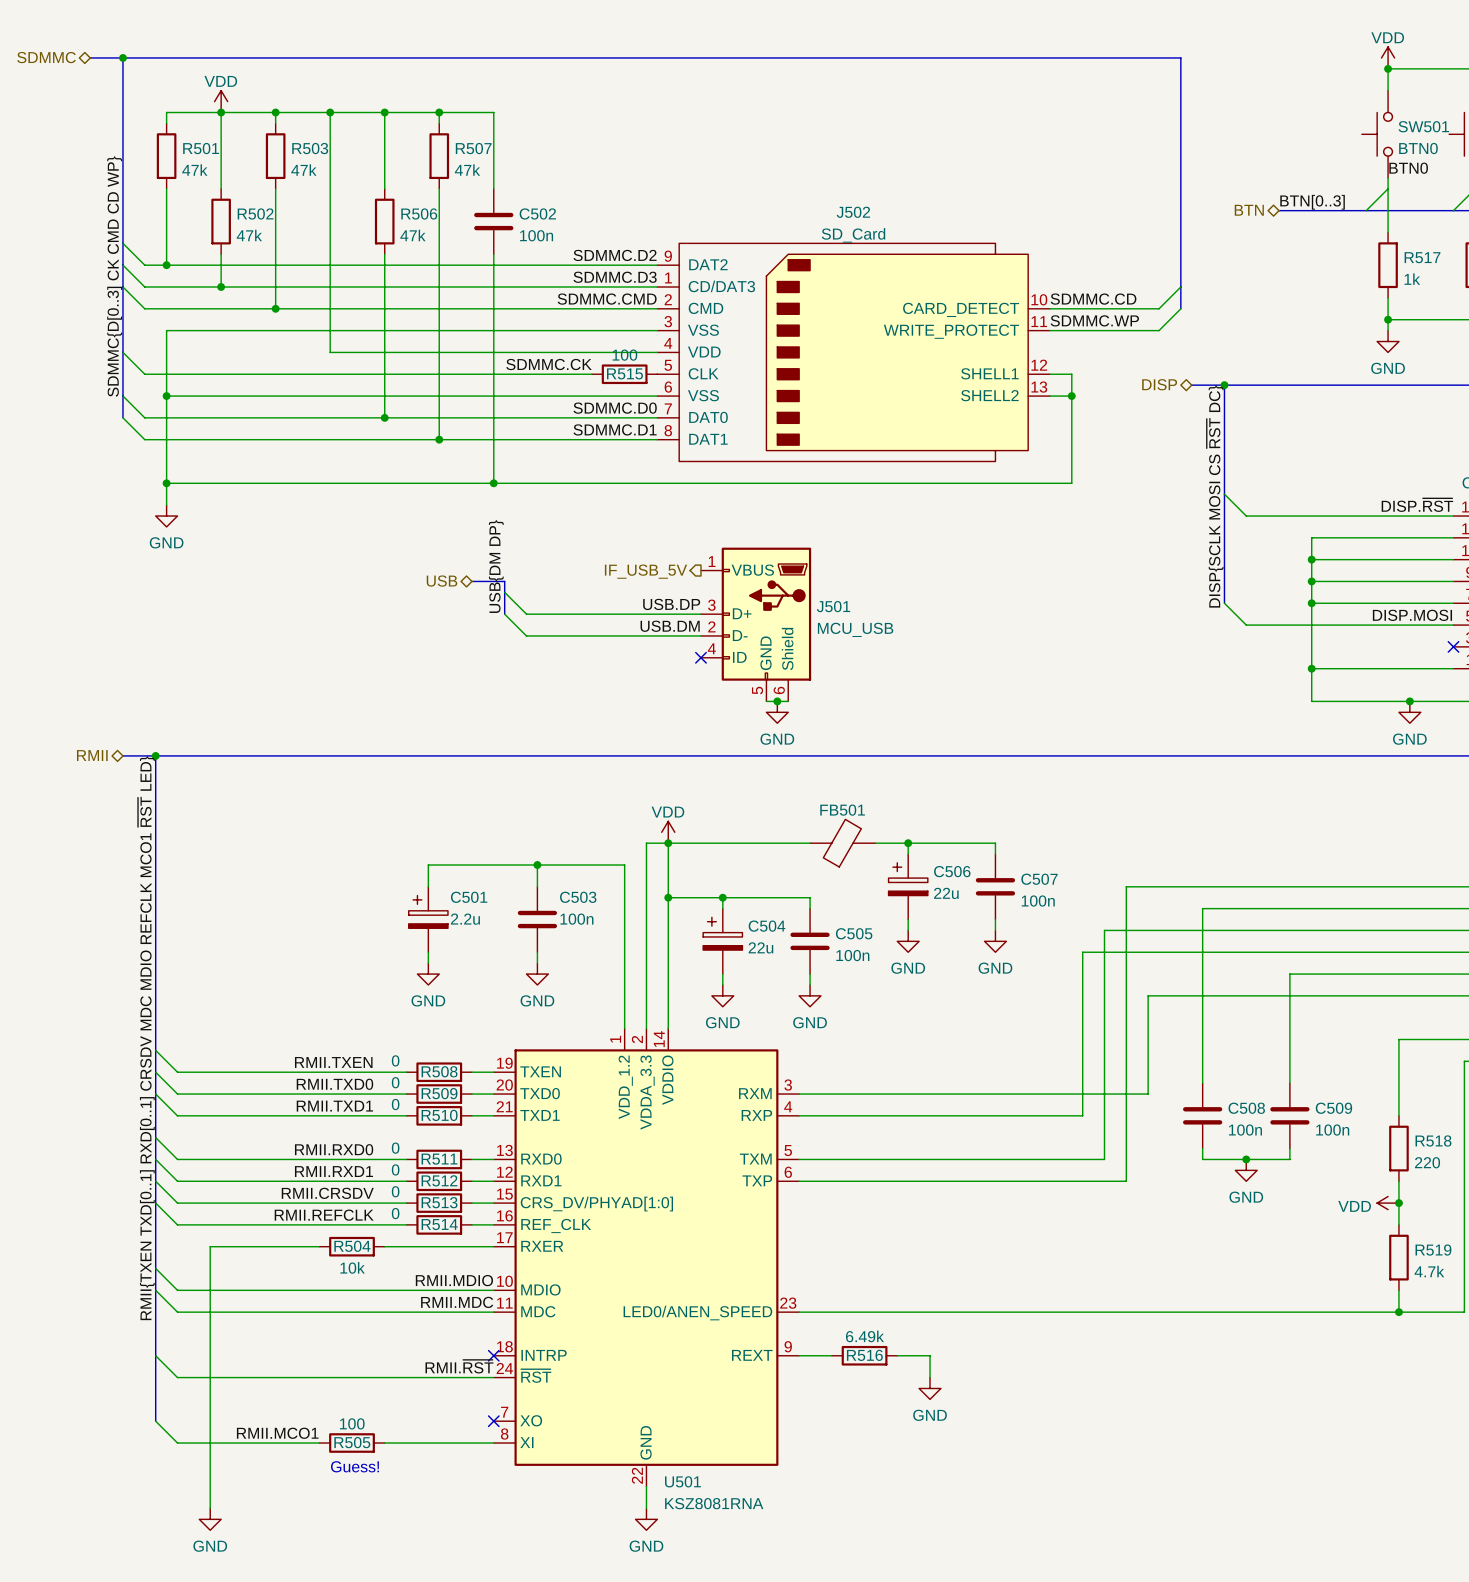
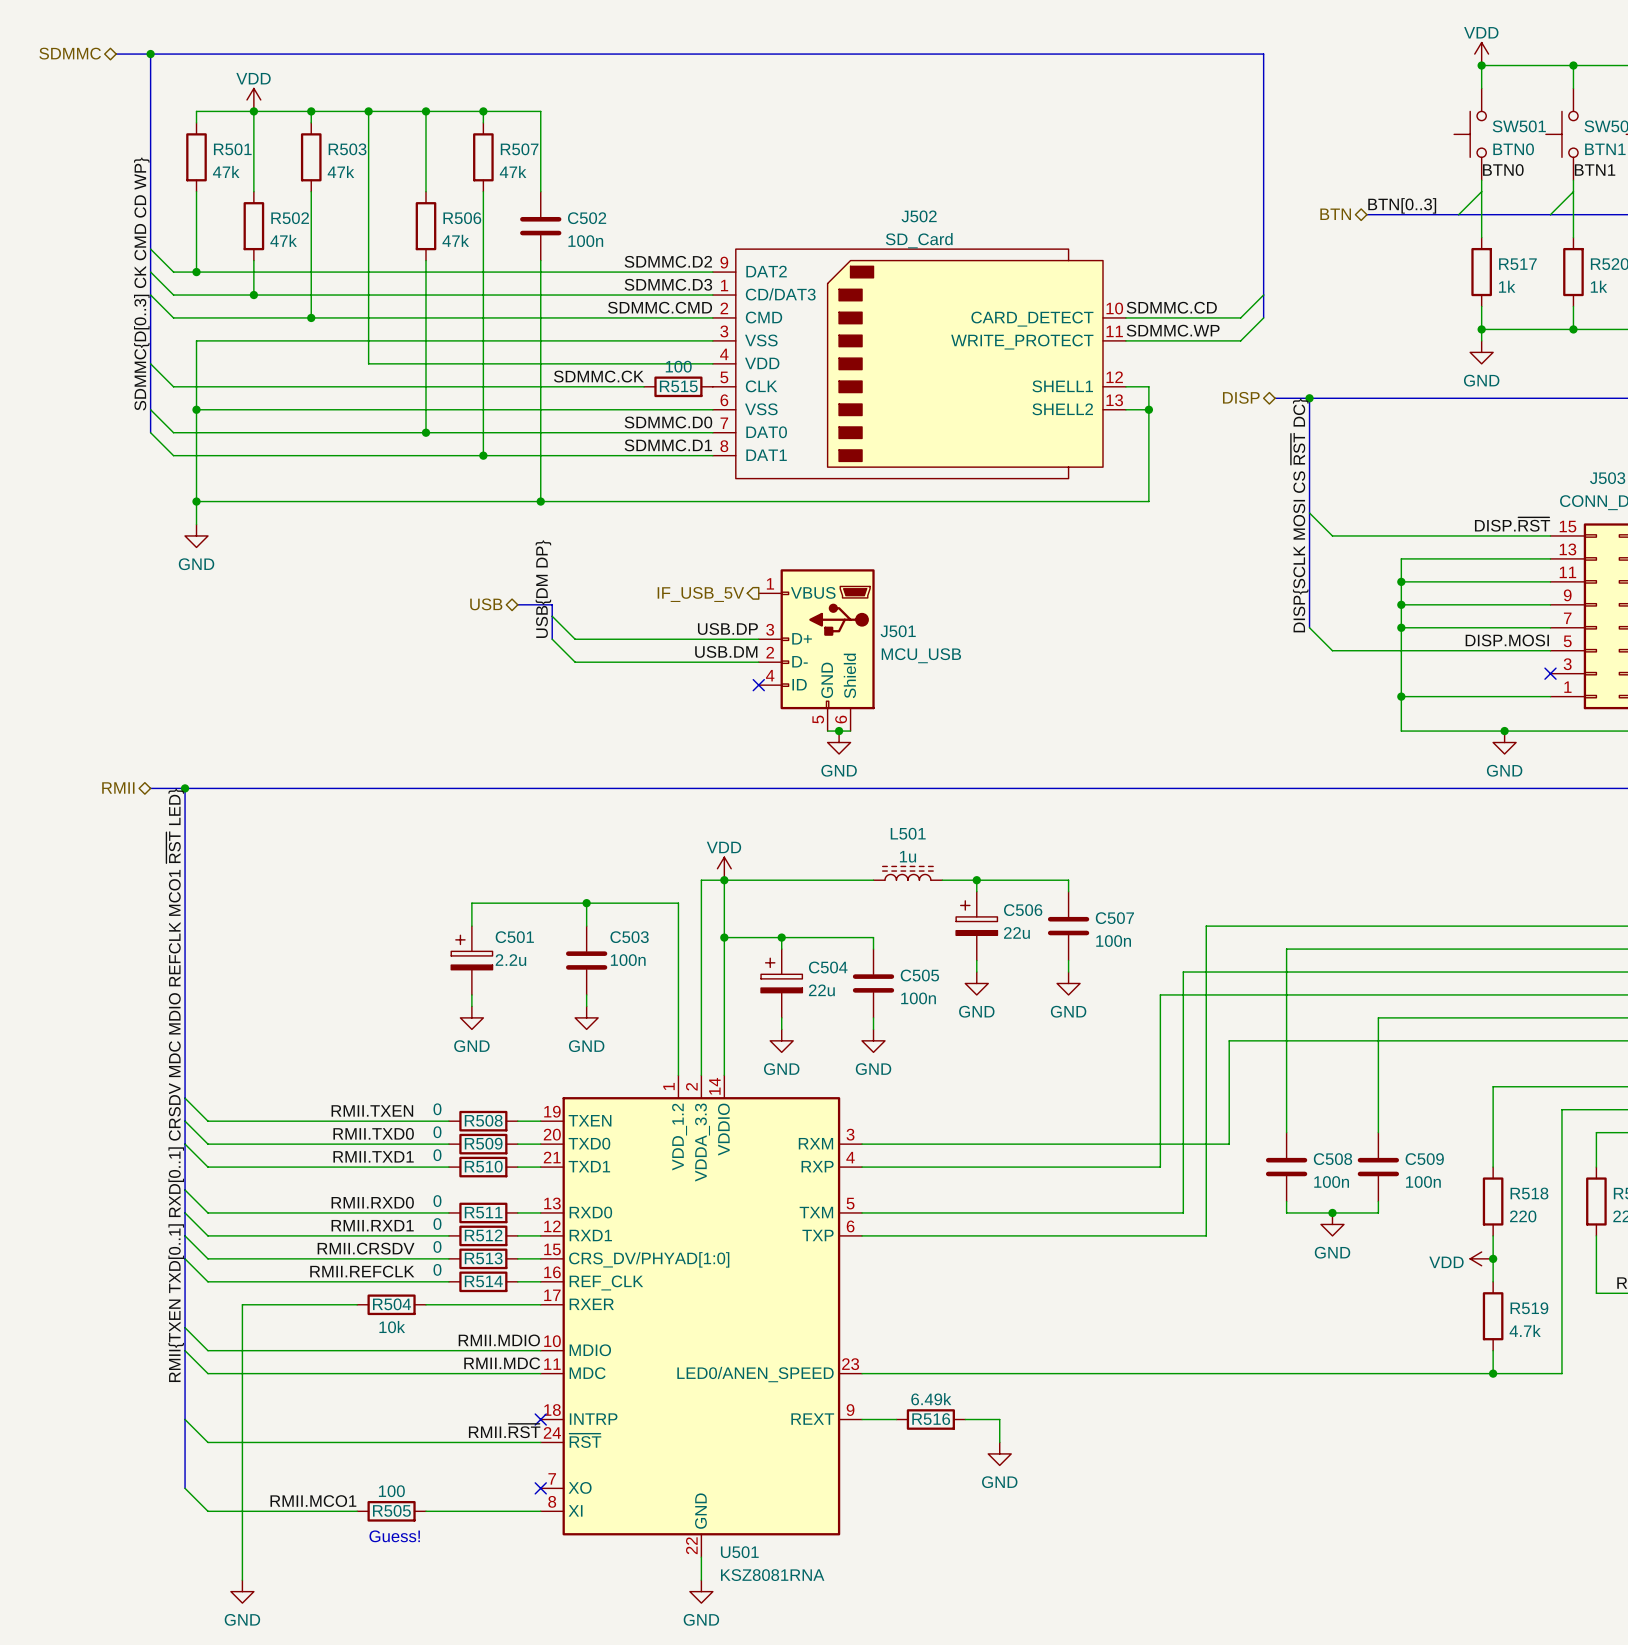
L501: none -> 1u (907, 873)
FB501: (842, 843) -> none

